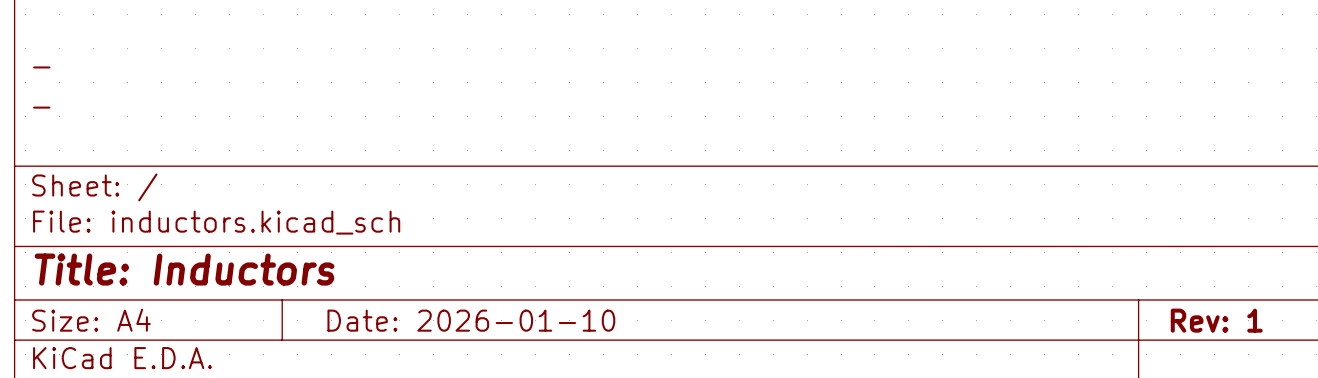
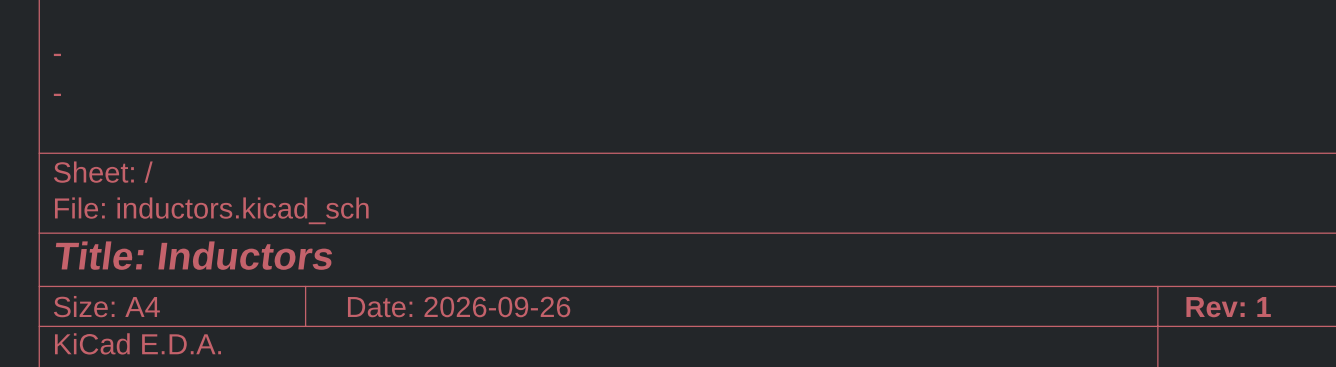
title block: Date: 2026-01-10 (471, 320) -> Date: 2026-09-26 (459, 306)

